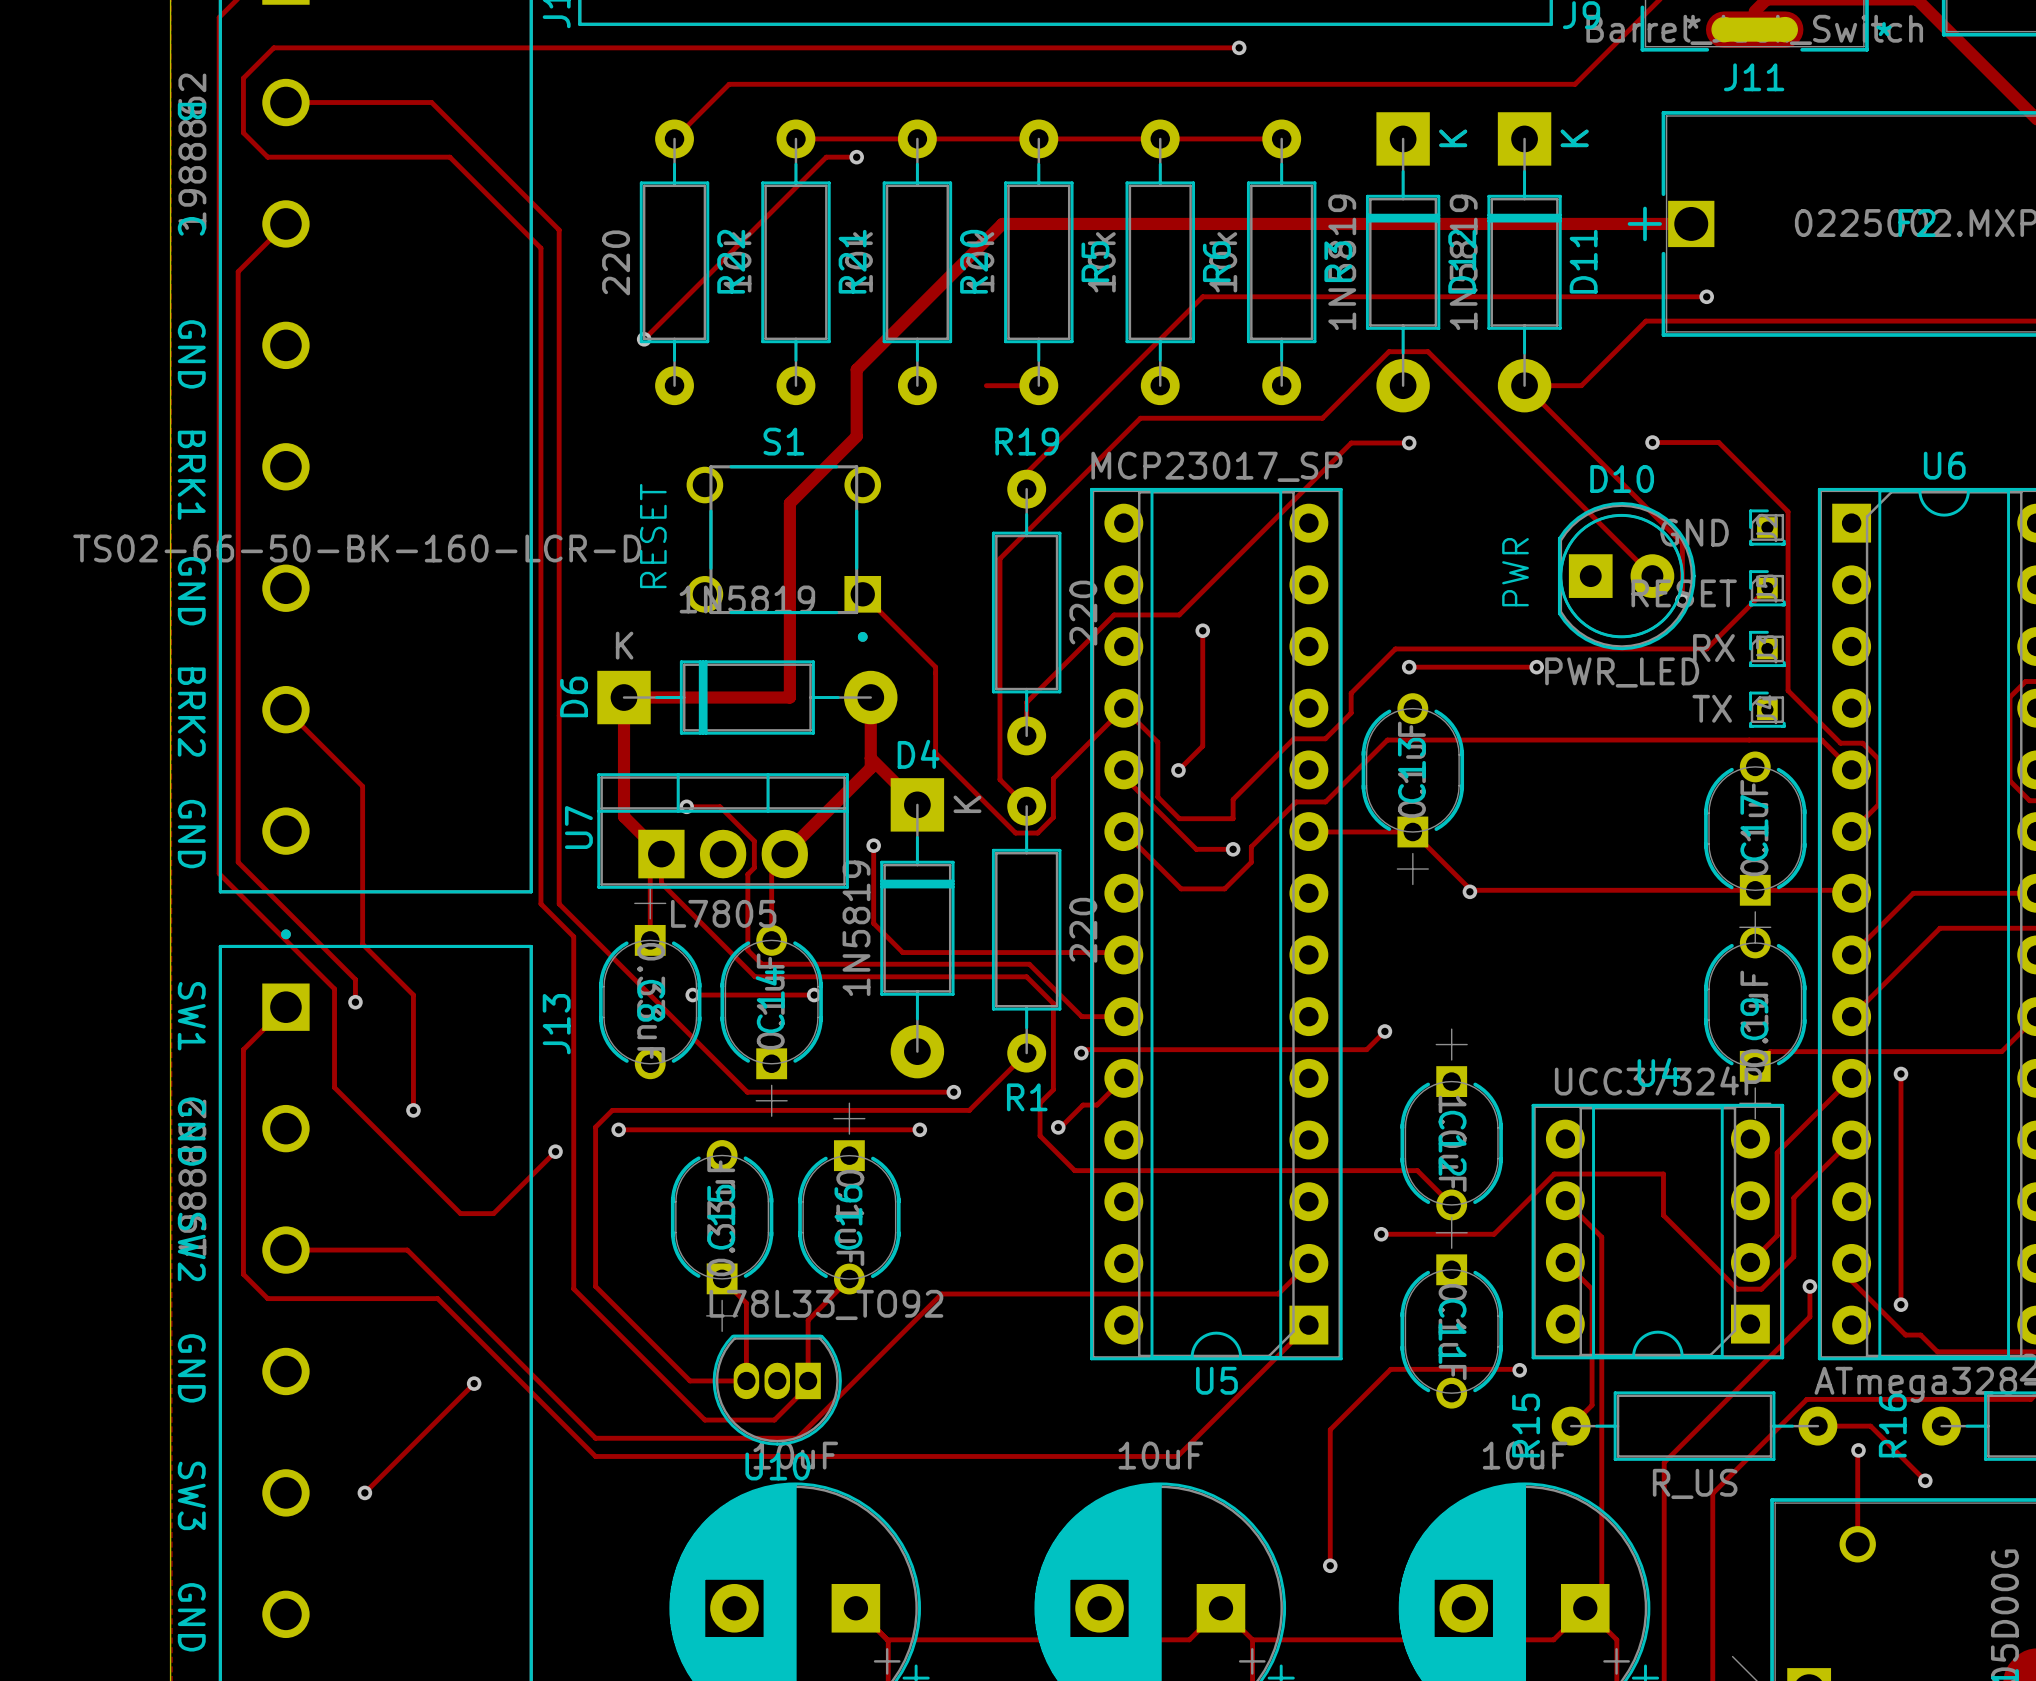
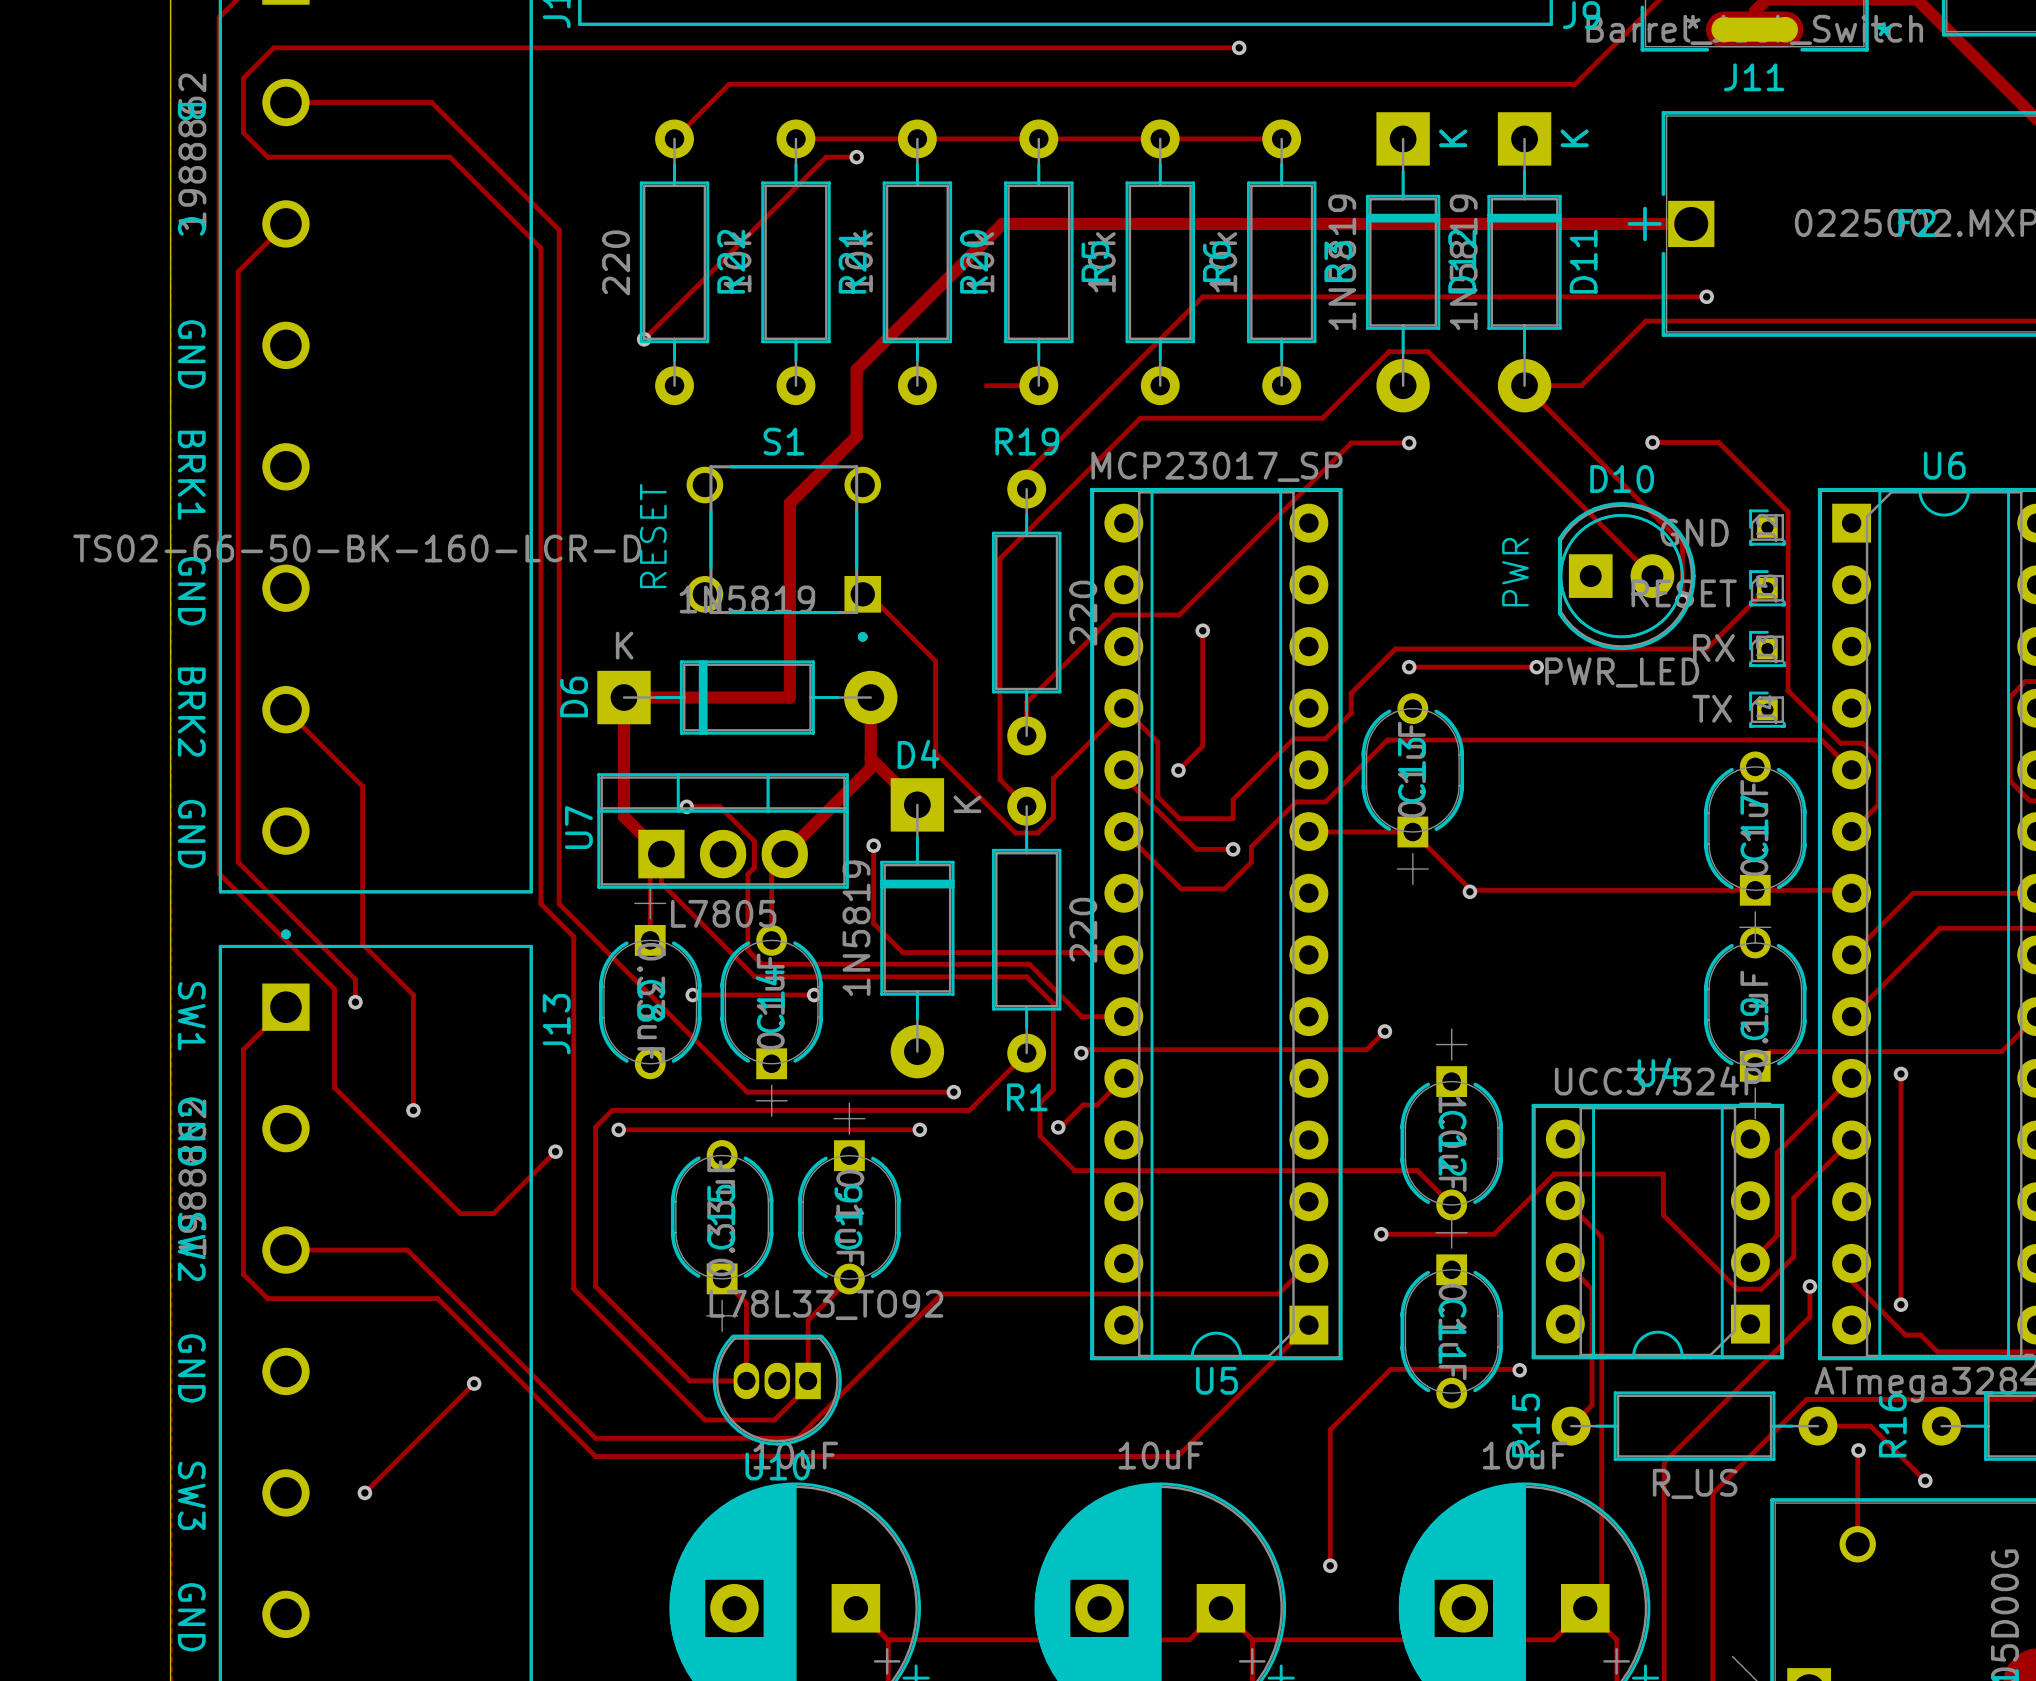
track: (862, 594) (935, 667) -> (874, 600) (935, 661) (935, 667)

